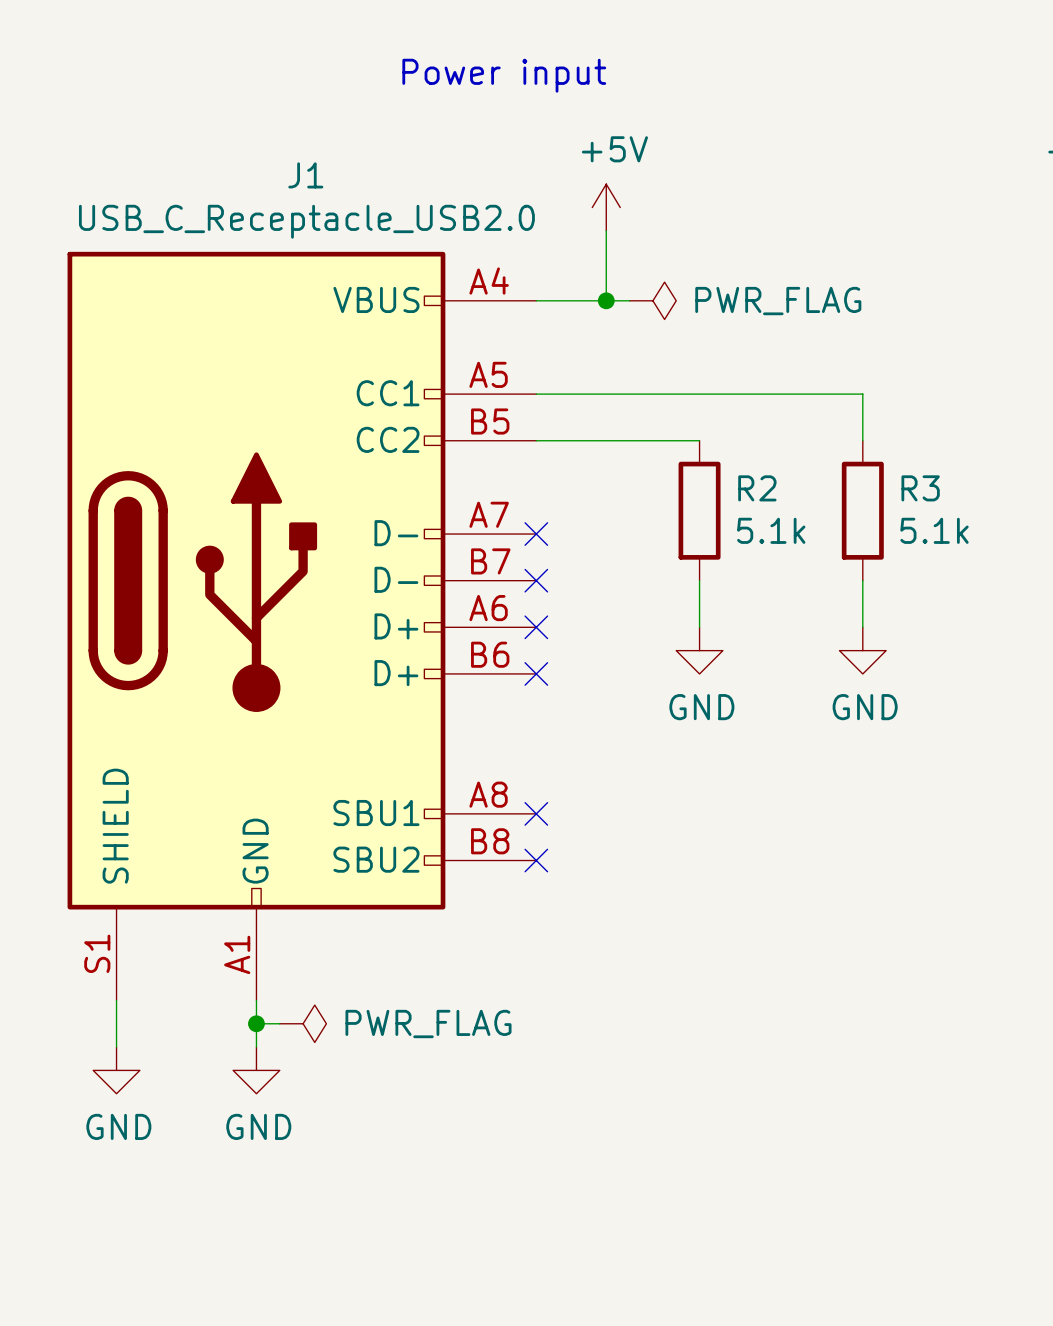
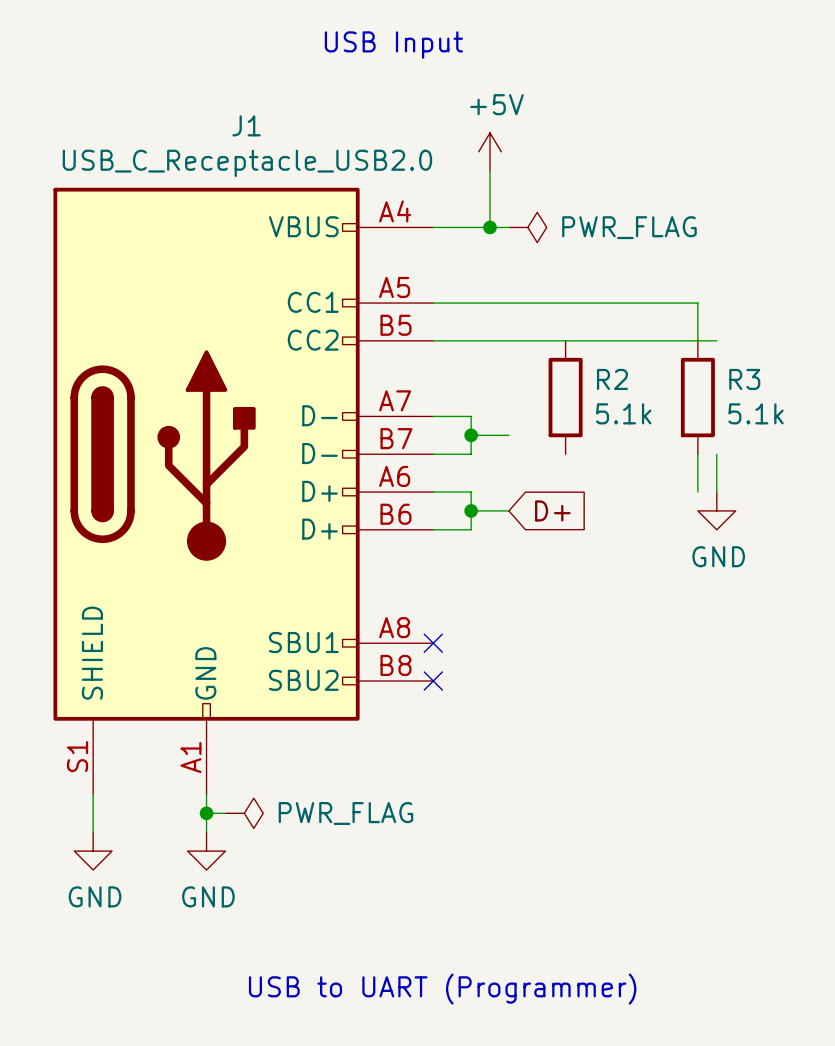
text: Power input (504, 75) -> USB Input (393, 45)
wire: none -> (565, 340) (716, 340)
wire: none -> (433, 416) (471, 416) (471, 454) (433, 454)
no-connect mark: (536, 534) -> none
wire: none -> (471, 435) (508, 435)
junction: none -> (471, 435)
no-connect mark: (536, 580) -> none
wire: (699, 580) (699, 627) -> (716, 454) (716, 492)
wire: none -> (433, 492) (471, 492) (471, 529) (433, 529)
no-connect mark: (536, 627) -> none
wire: none -> (471, 510) (508, 510)
junction: none -> (471, 510)
global label: none -> D+ (552, 510)
power symbol: GND (699, 650) -> none
power symbol position: GND (862, 650) -> GND (716, 510)
no-connect mark: (536, 673) -> none
text: none -> USB to UART (Programmer) (442, 989)

